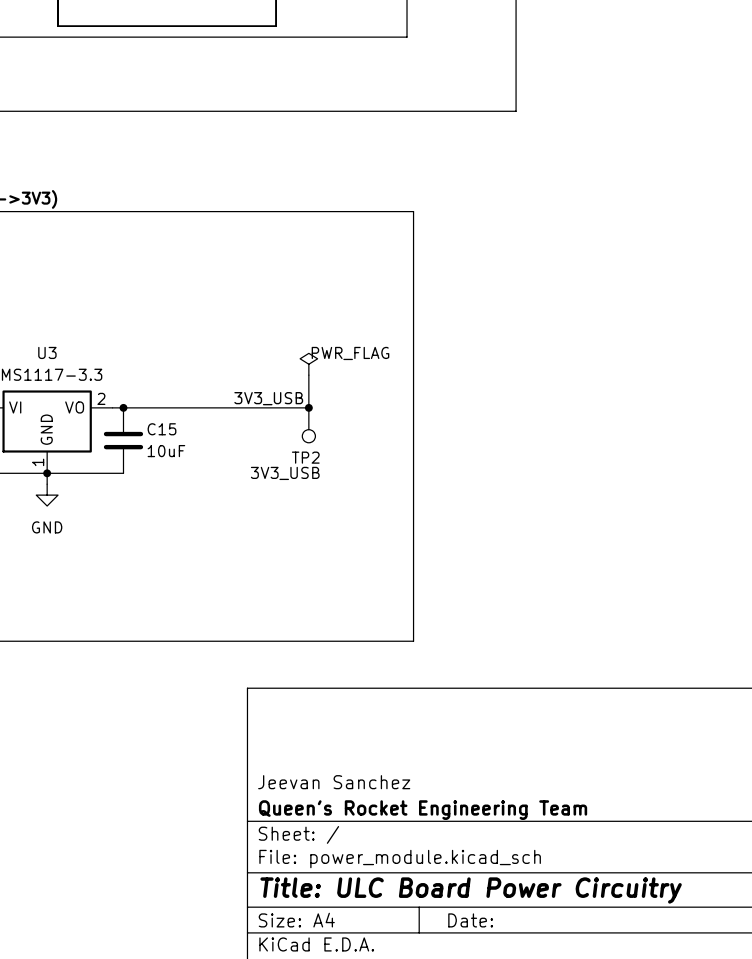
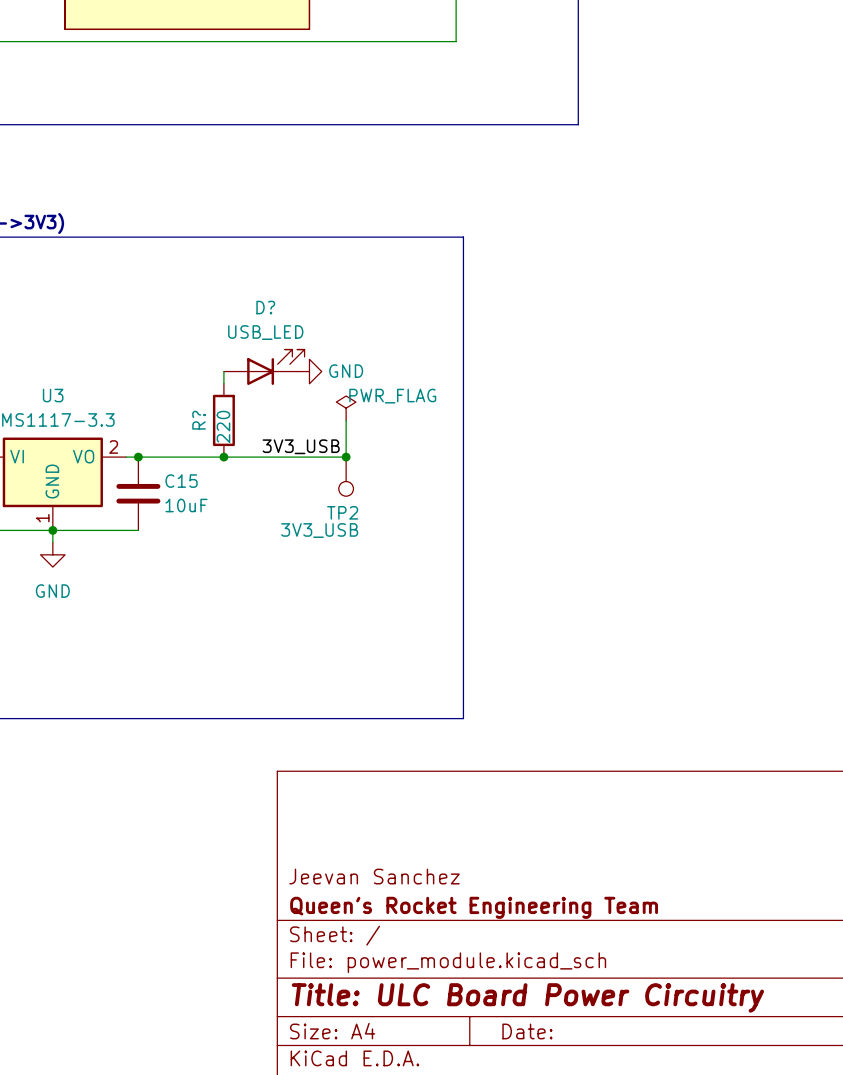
D?: none -> USB_LED (264, 367)
wire: none -> (223, 371) (223, 383)
power symbol: none -> GND (309, 371)
R?: none -> 220 (223, 420)
junction: none -> (223, 457)

